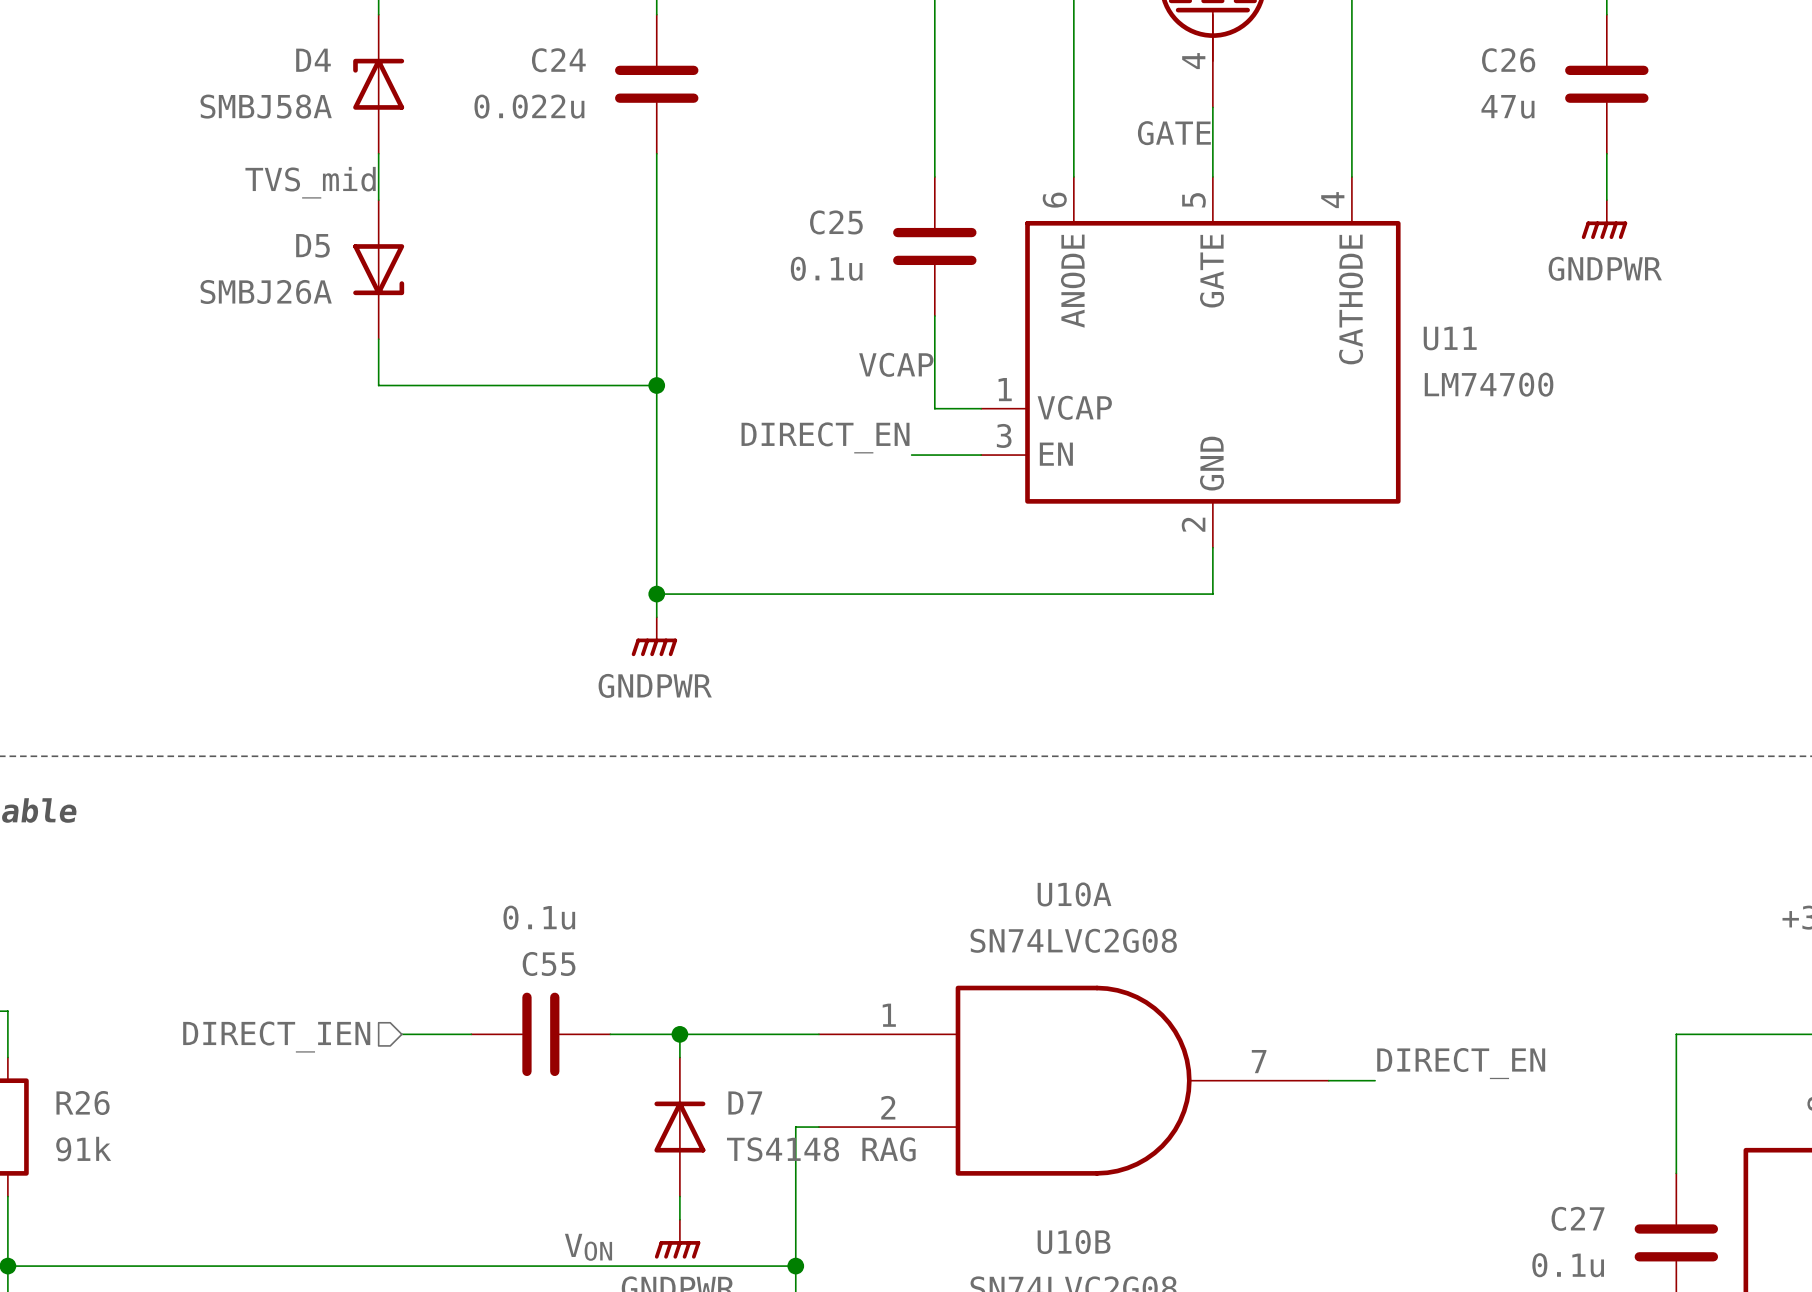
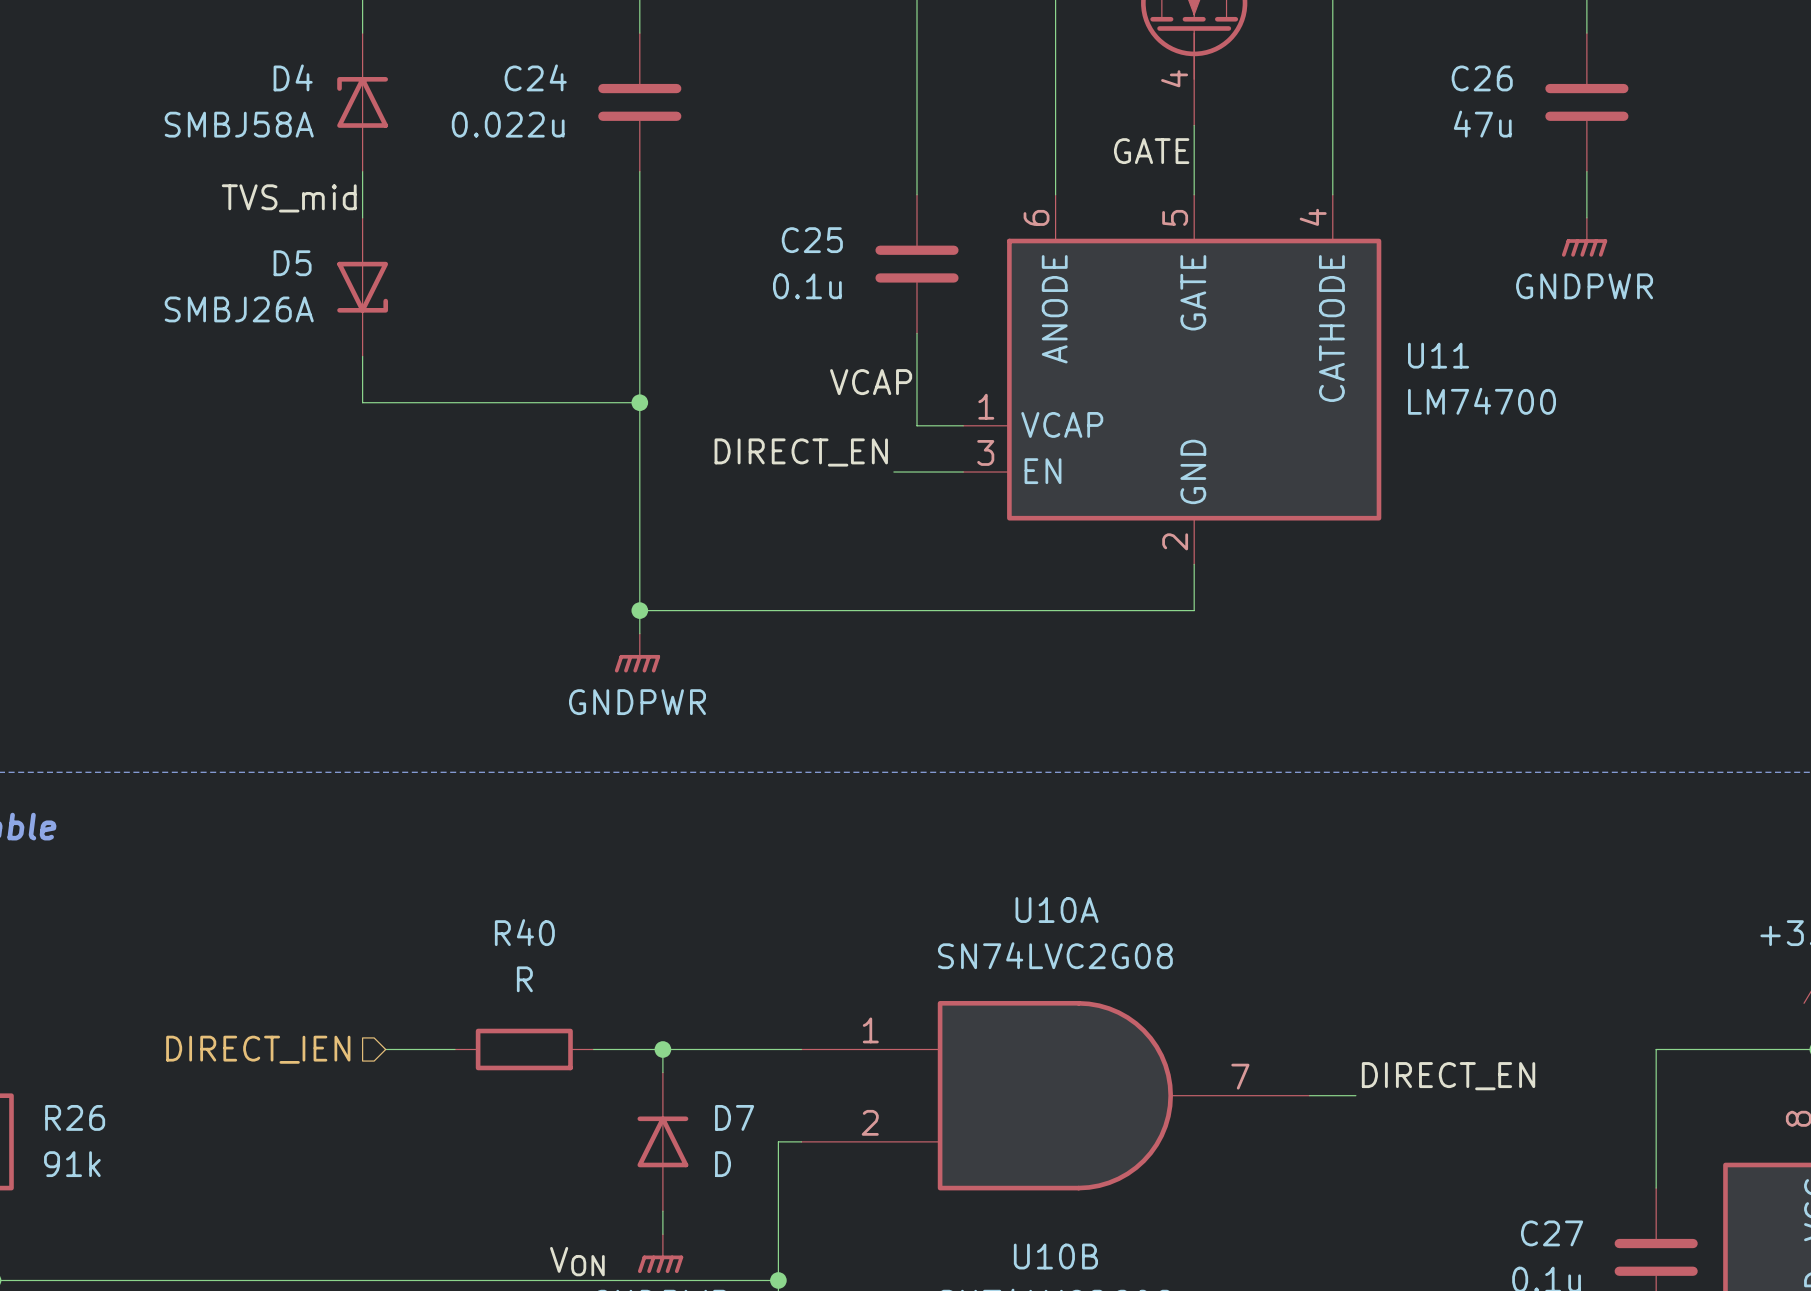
C55: 0.1u (540, 1034) -> none
R40: none -> R (524, 1049)
D7 value: TS4148 RAG (821, 1149) -> D (723, 1164)

